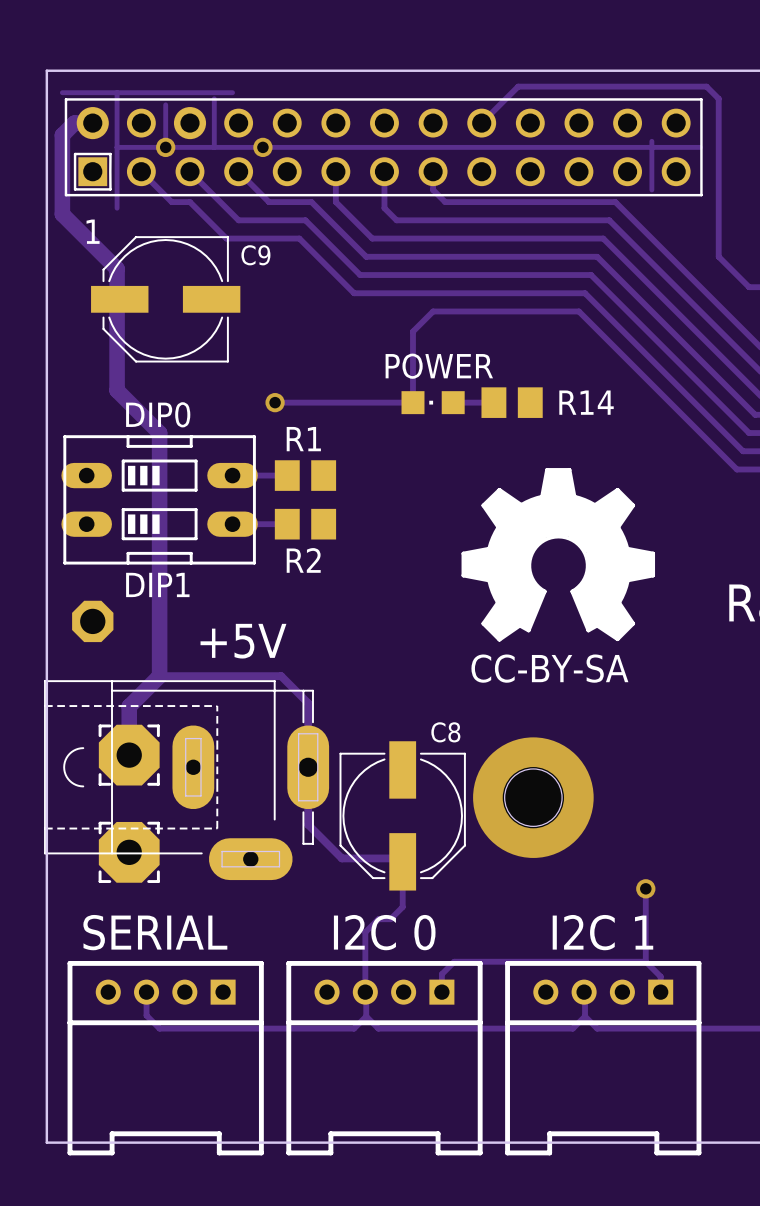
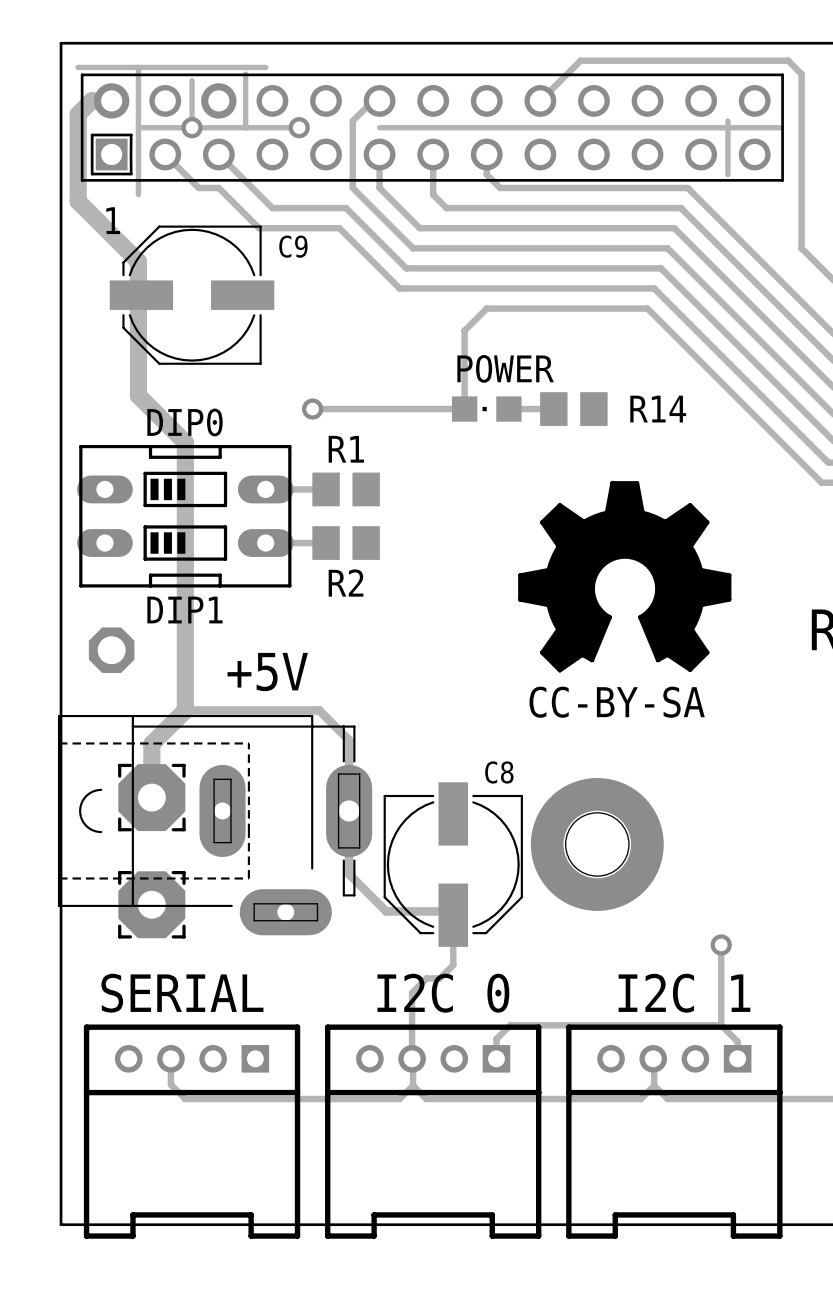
track: (262, 147) (335, 147) -> none
track: (238, 171) (269, 202) (311, 202) -> (379, 100) (372, 100) (352, 121) (352, 188)

